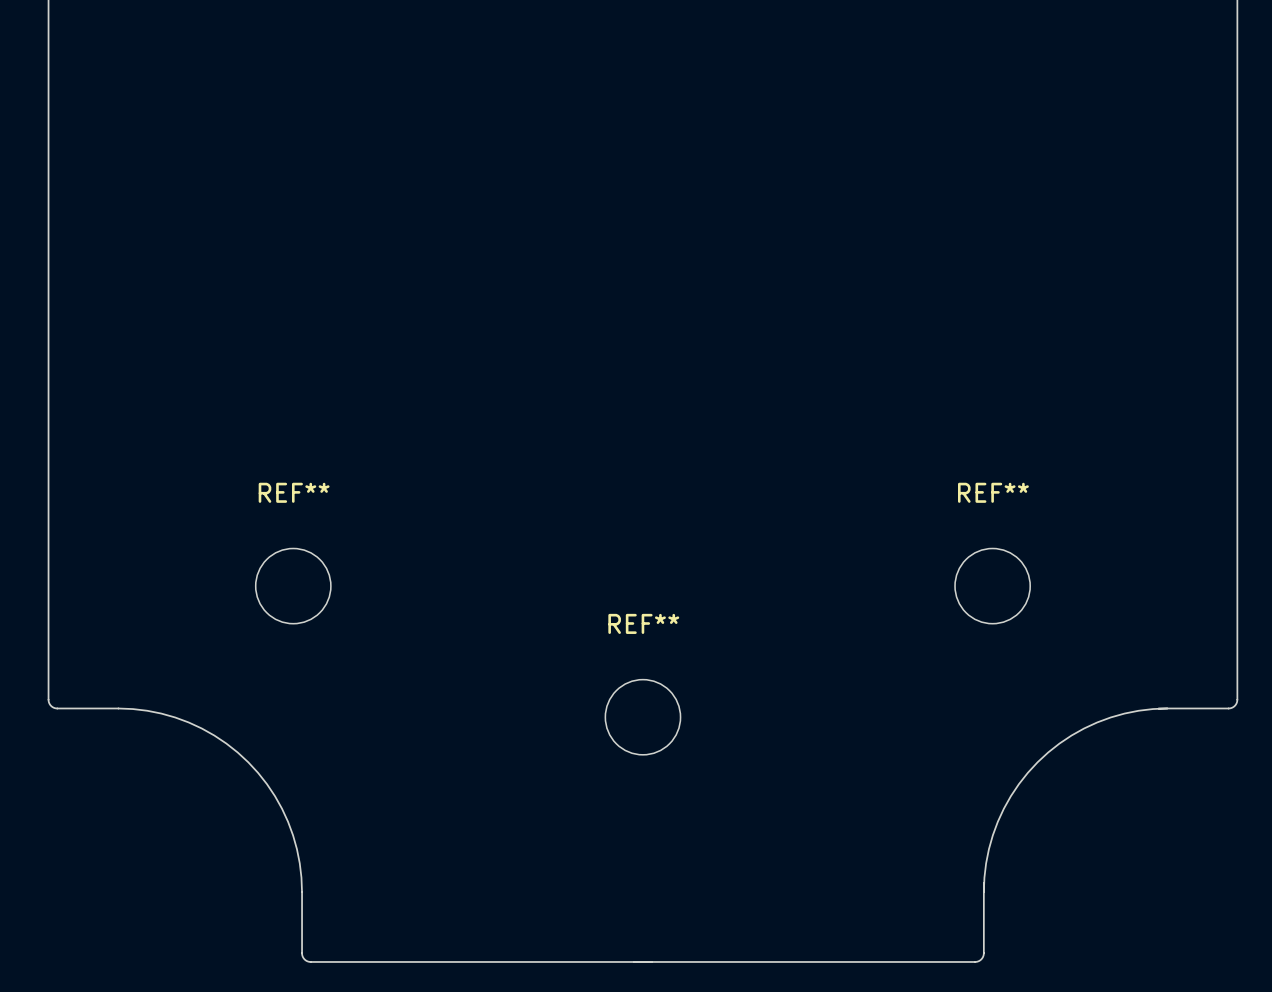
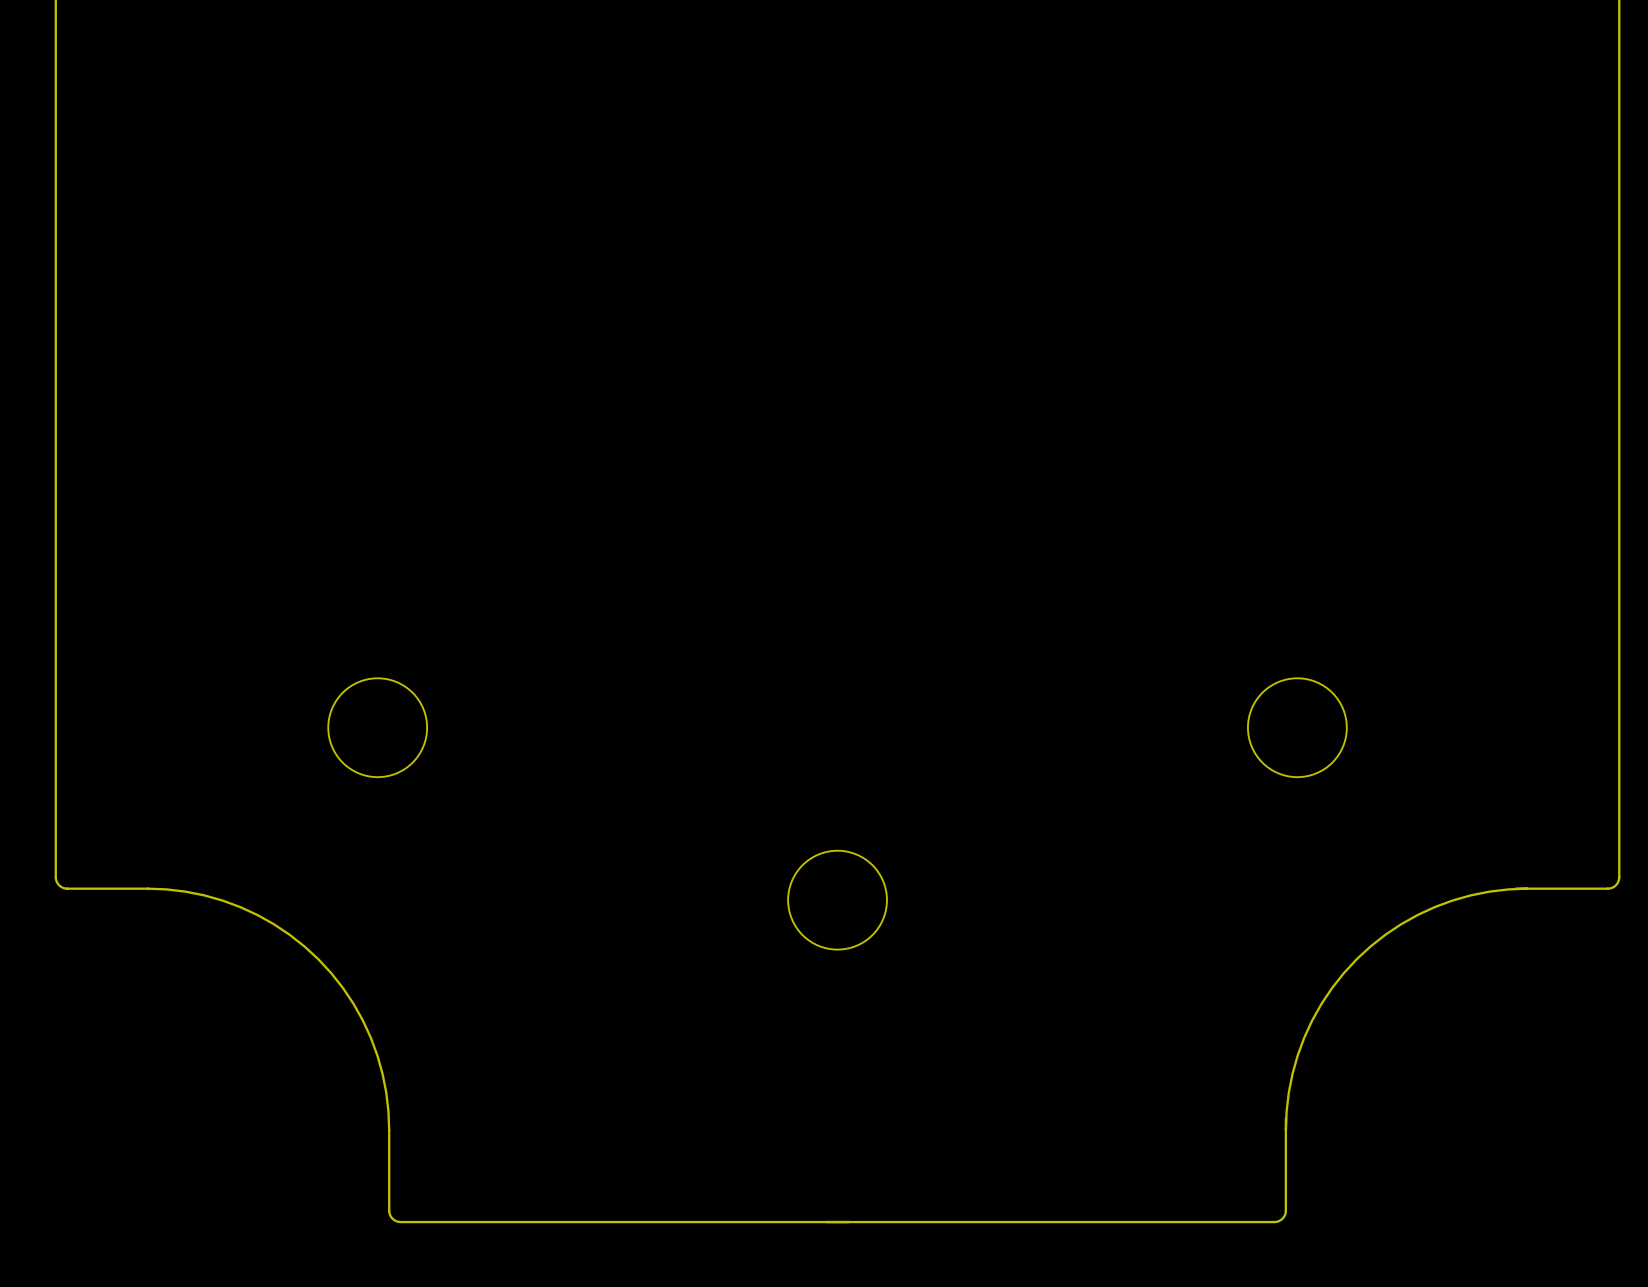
REF** name: REF** (294, 492) -> none
REF** name: REF** (993, 492) -> none
REF** name: REF** (643, 623) -> none

